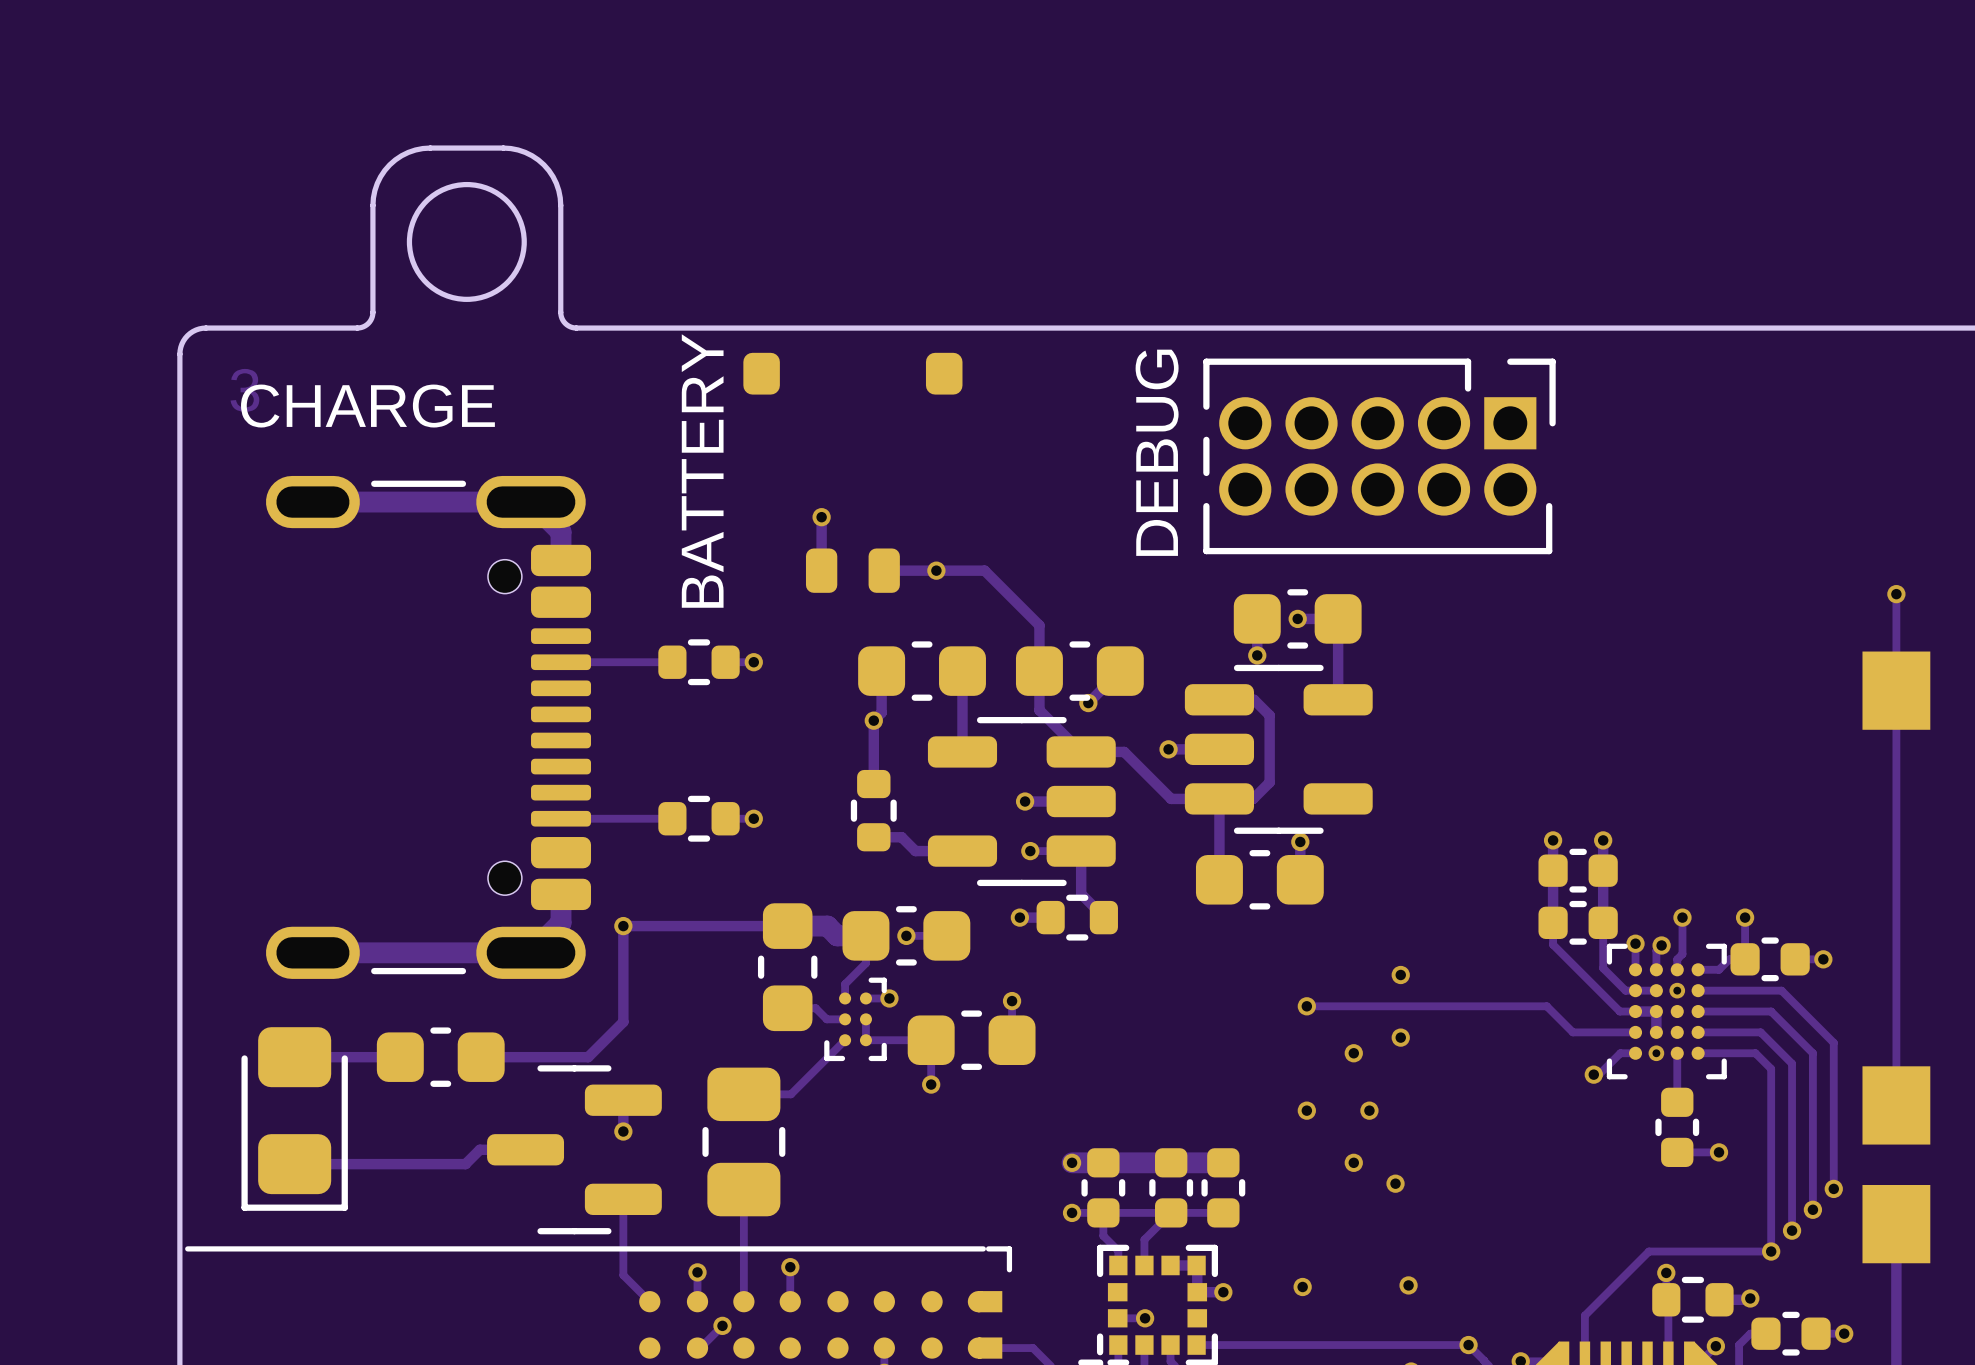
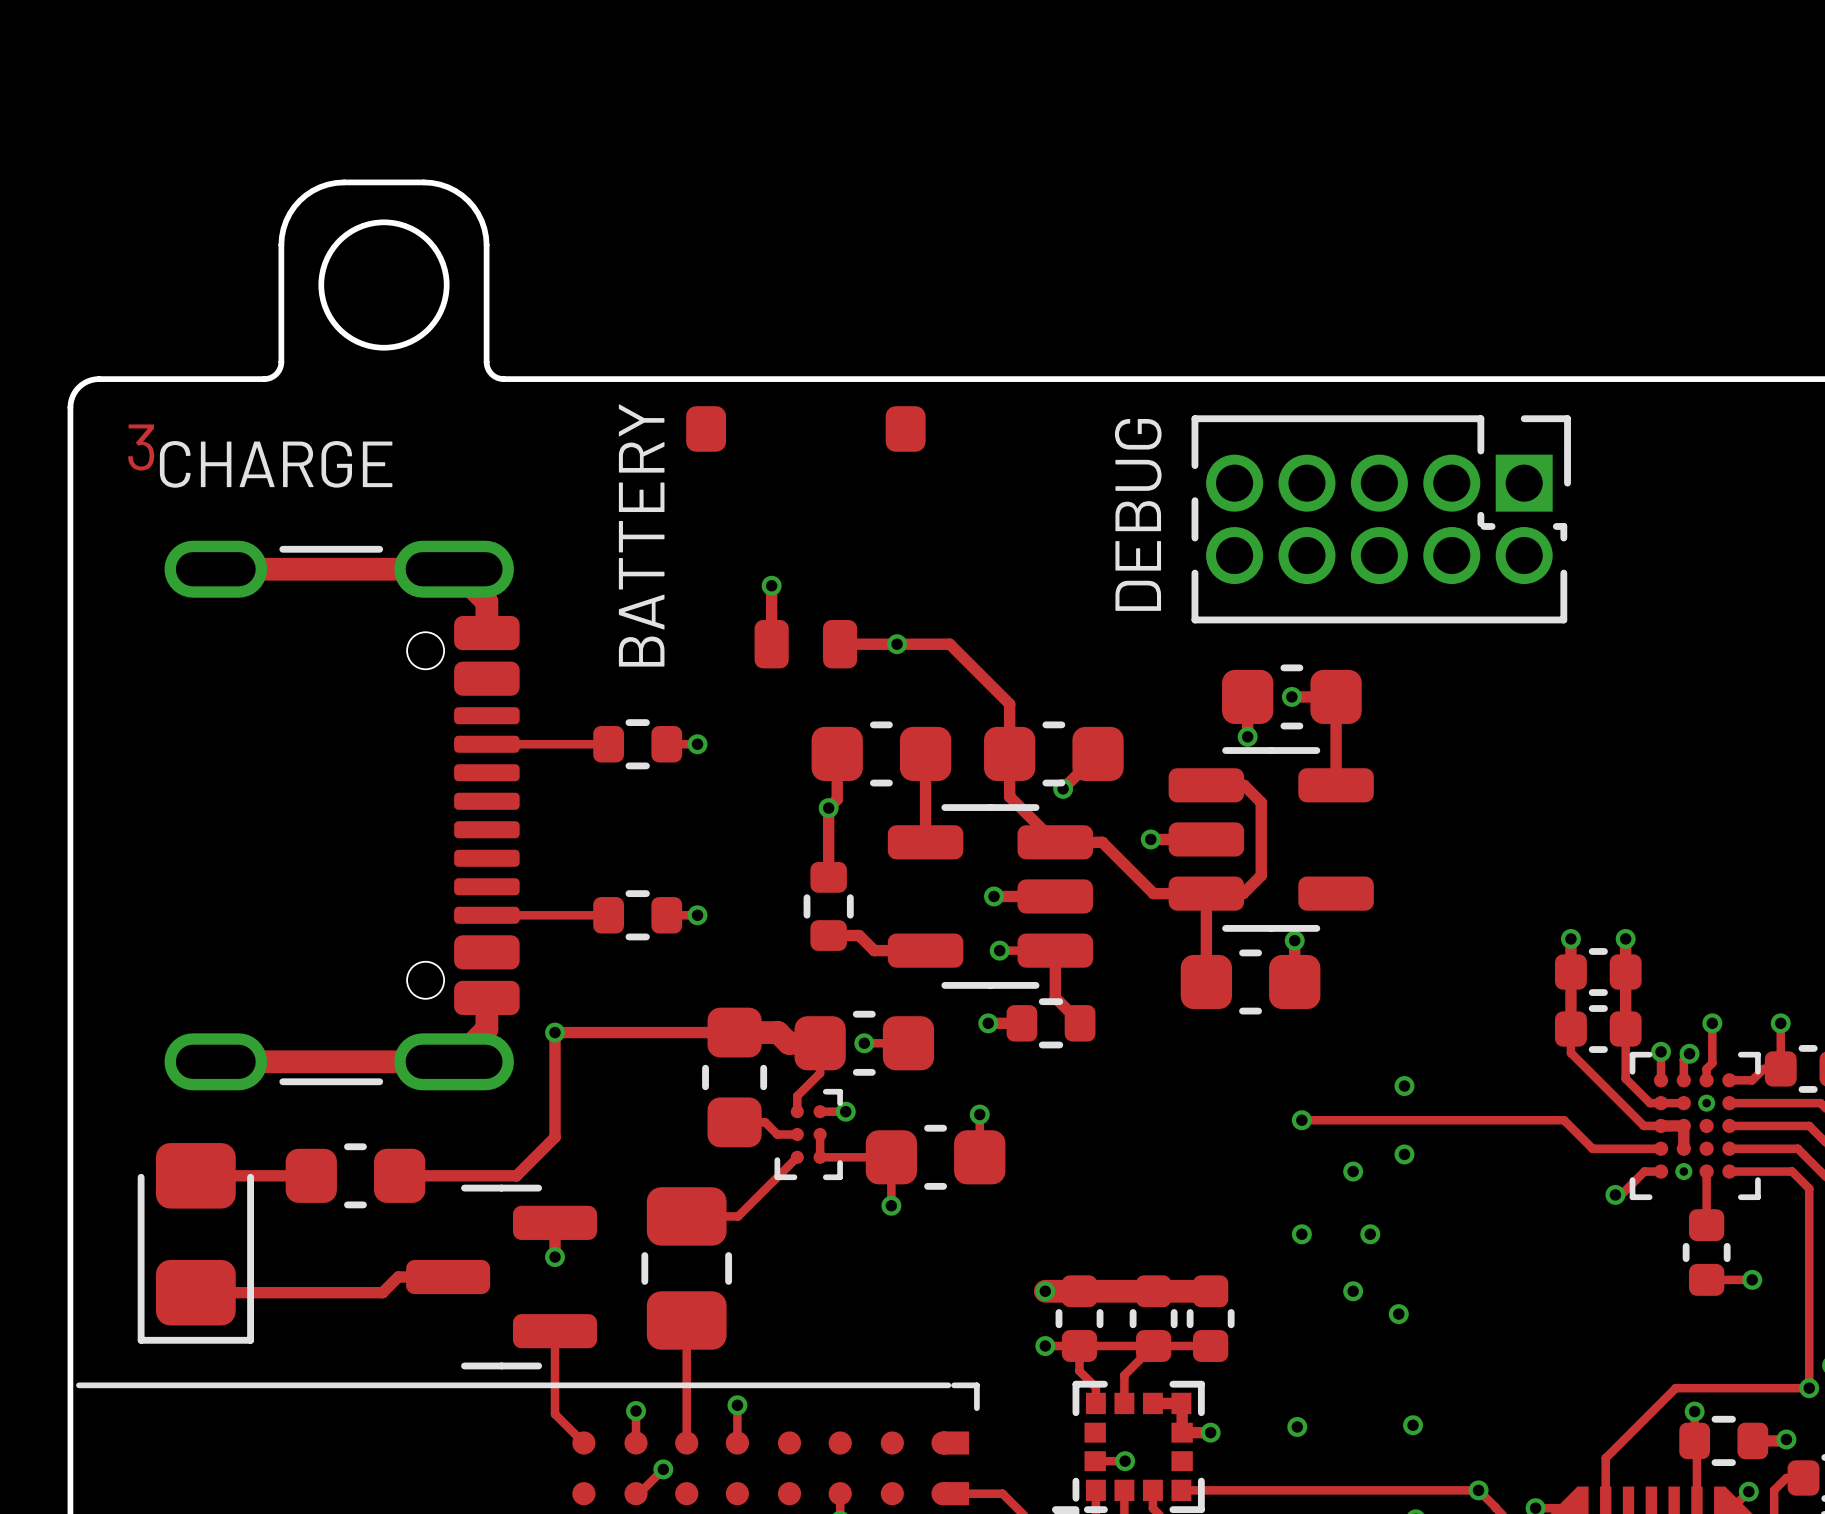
part footprint: [1203, 358, 1556, 555] -> [1191, 415, 1571, 624]

